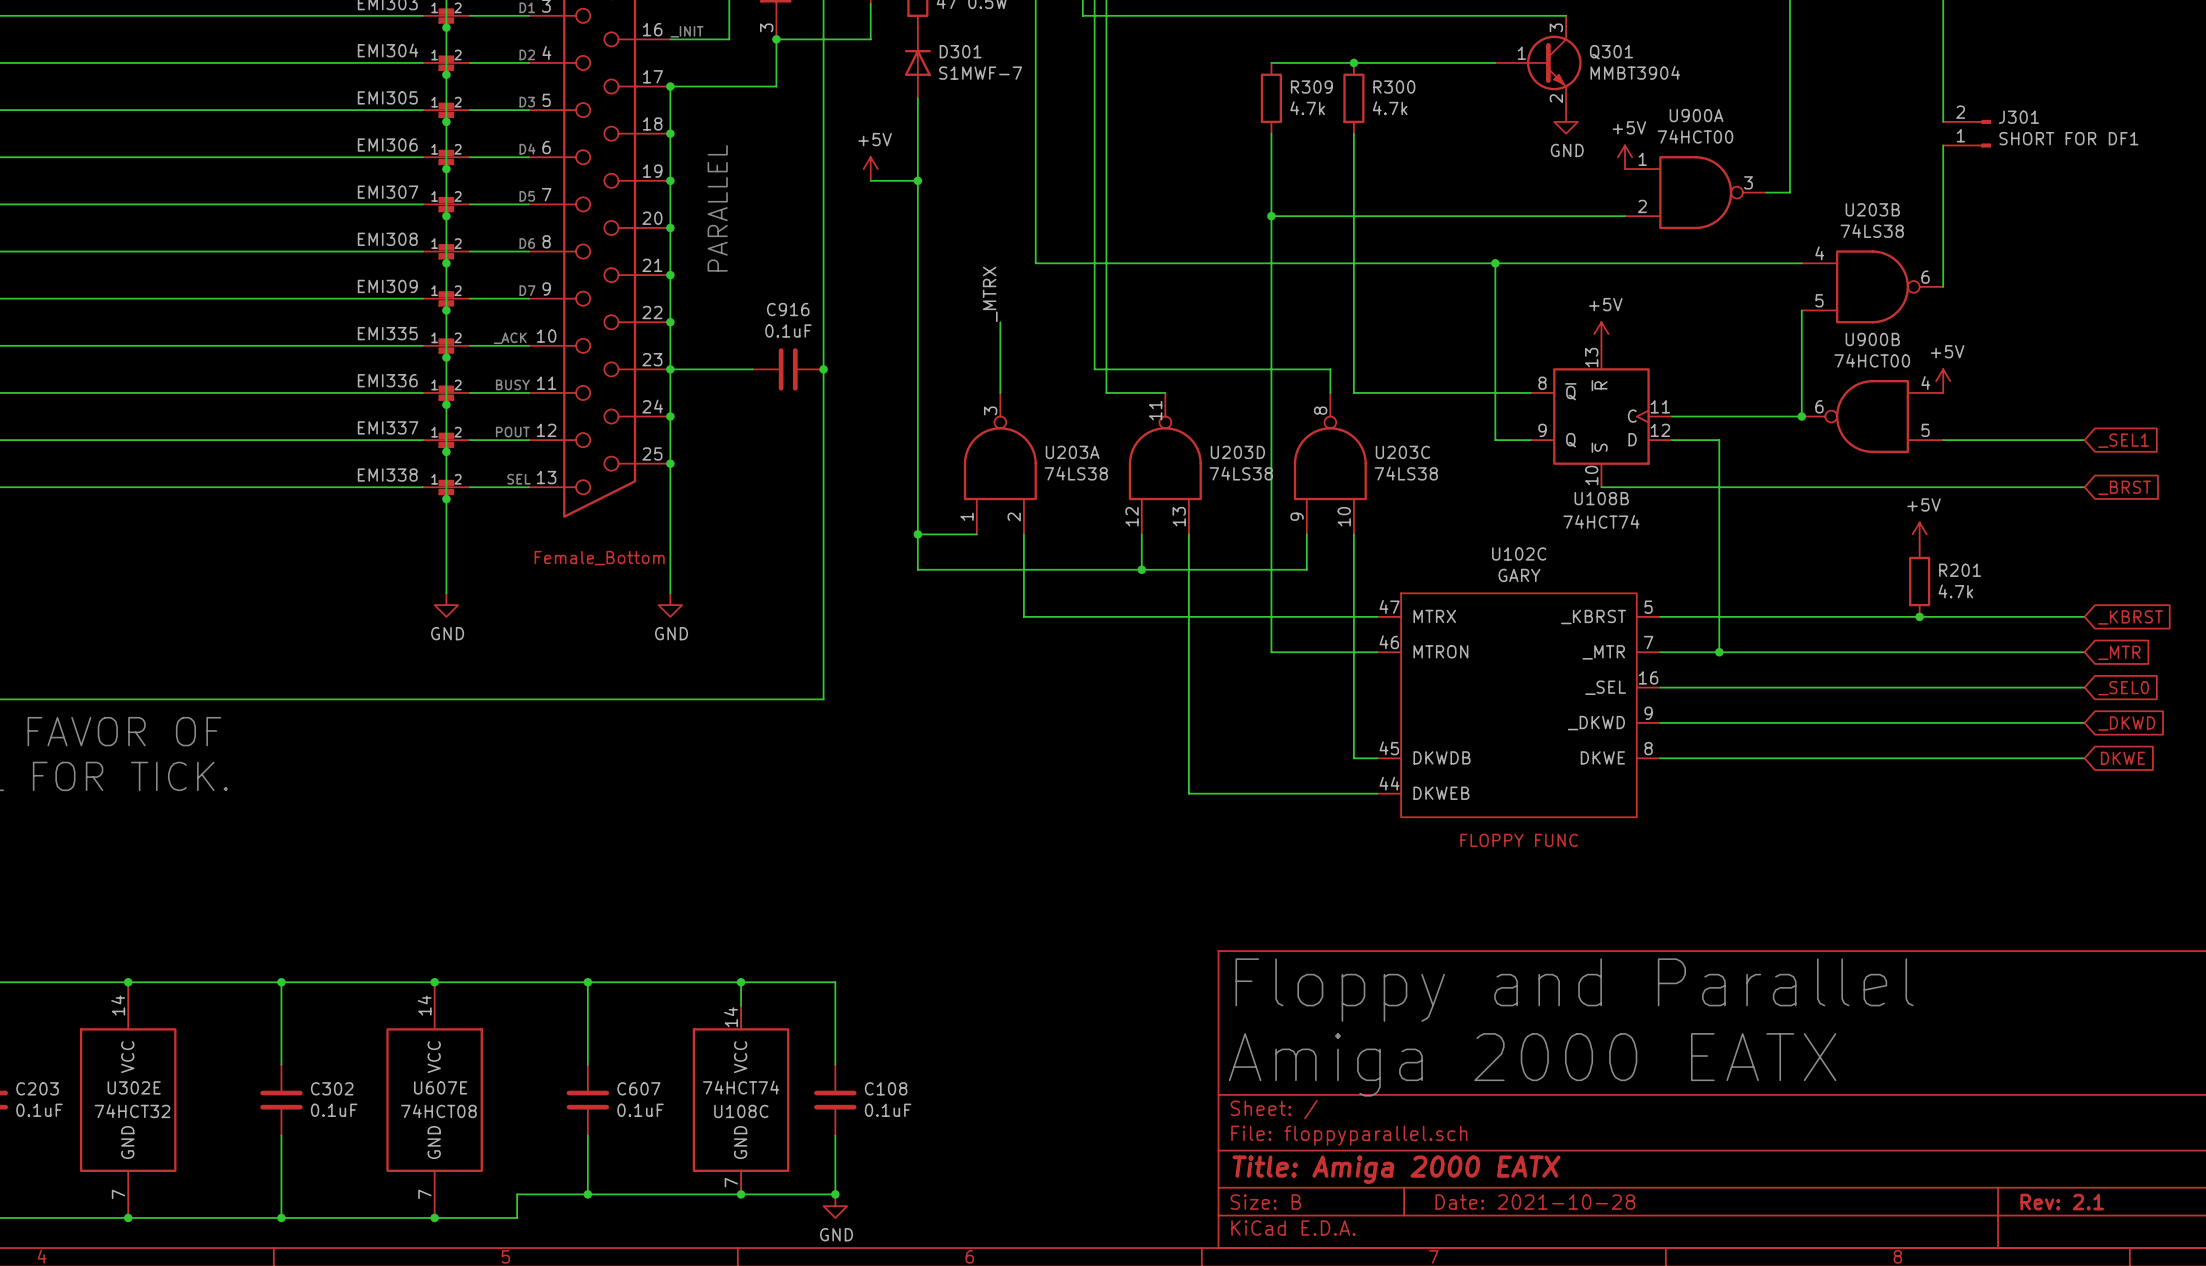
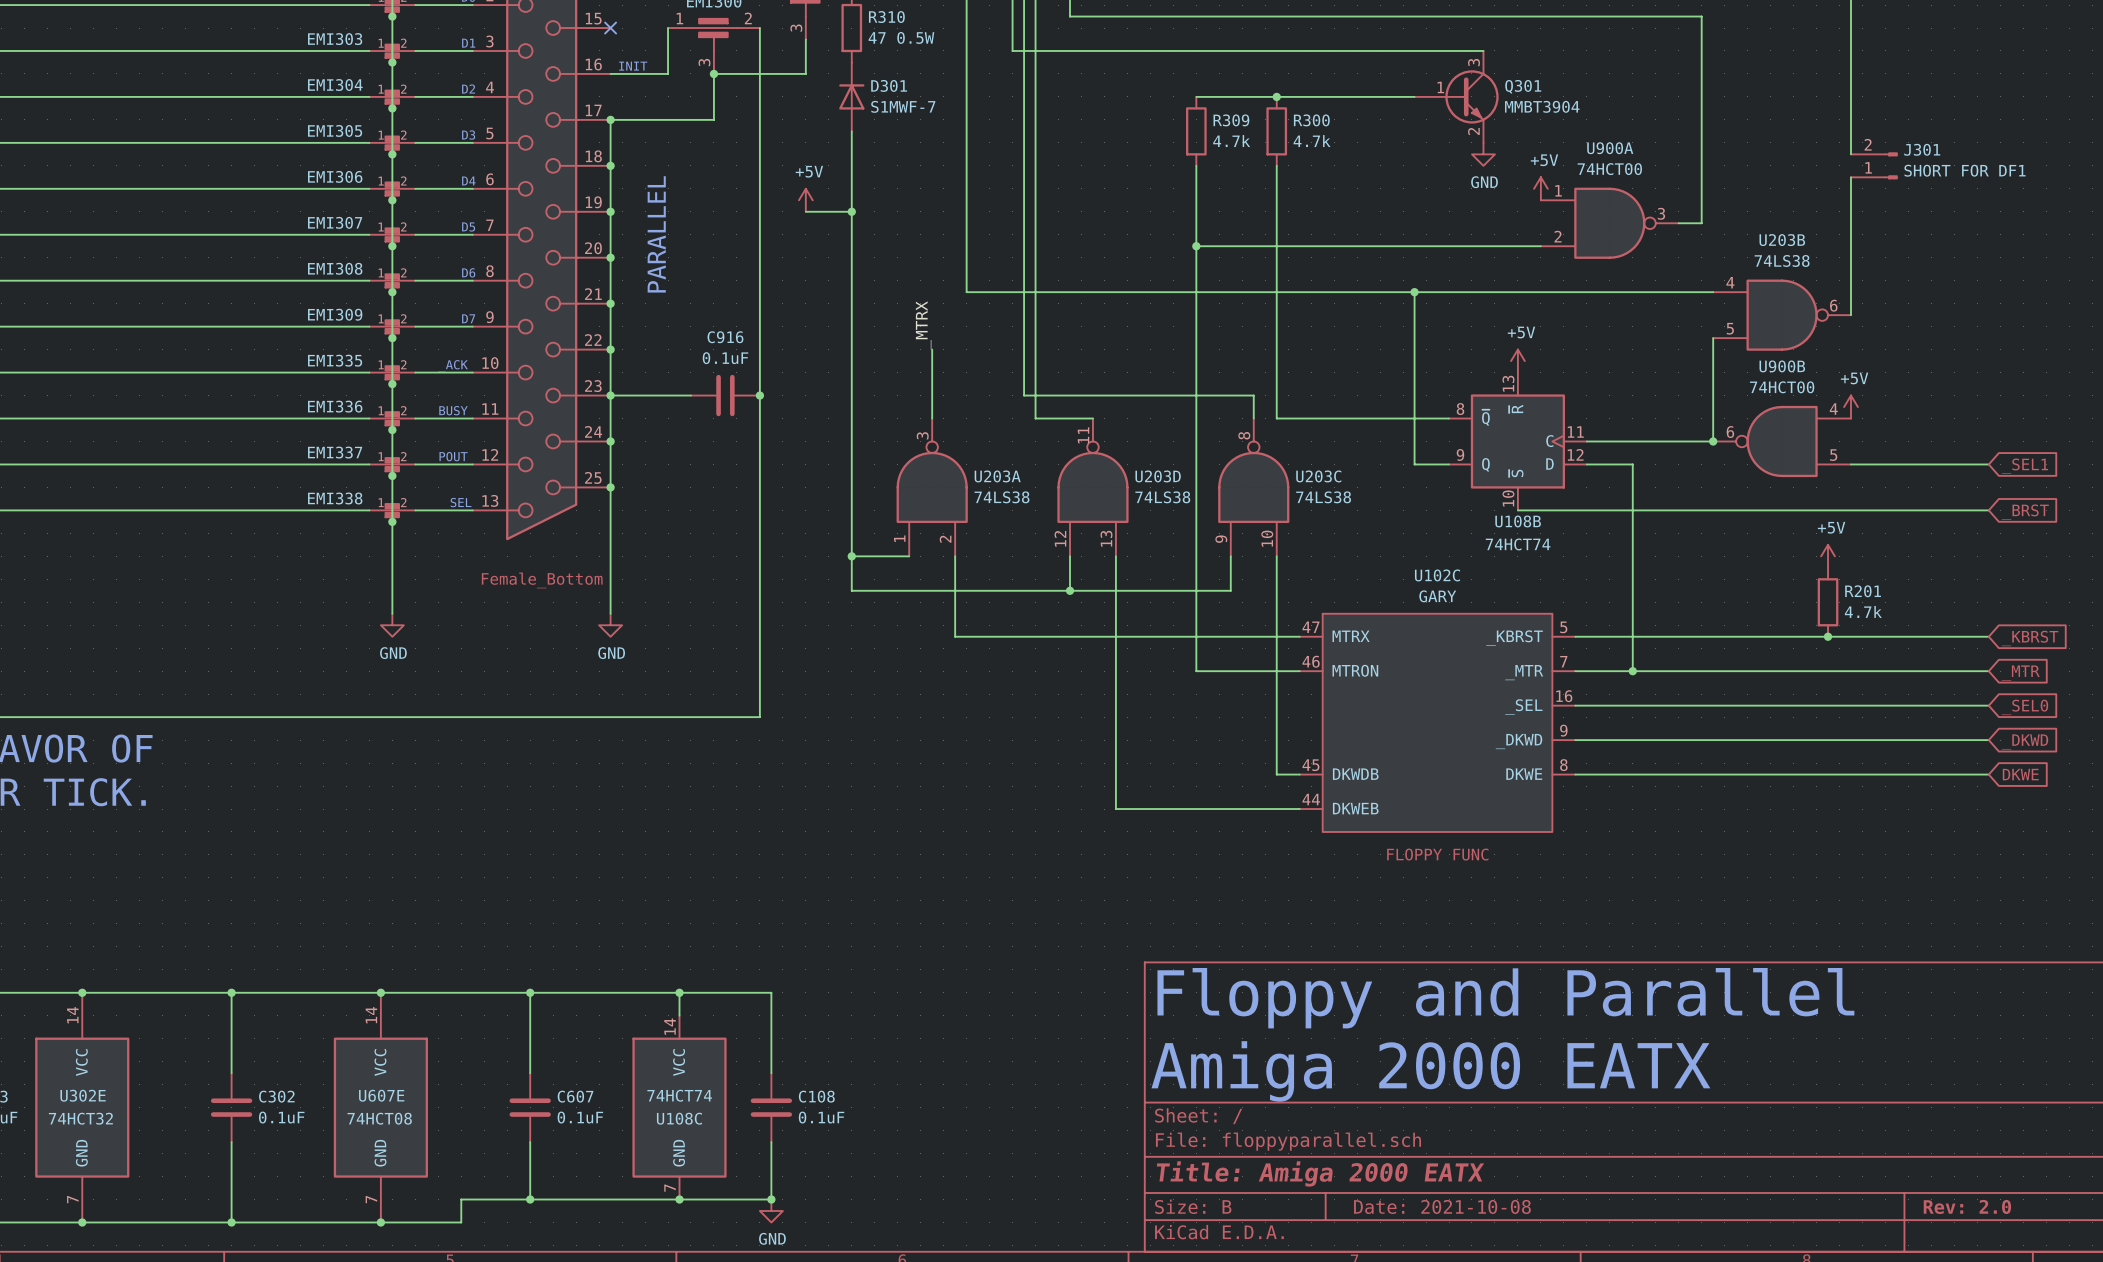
title block: Date: 2021-10-28 (1535, 1202) -> Date: 2021-10-08 (1442, 1206)
title block: Rev: 2.1 (2062, 1202) -> Rev: 2.0 (1967, 1206)

